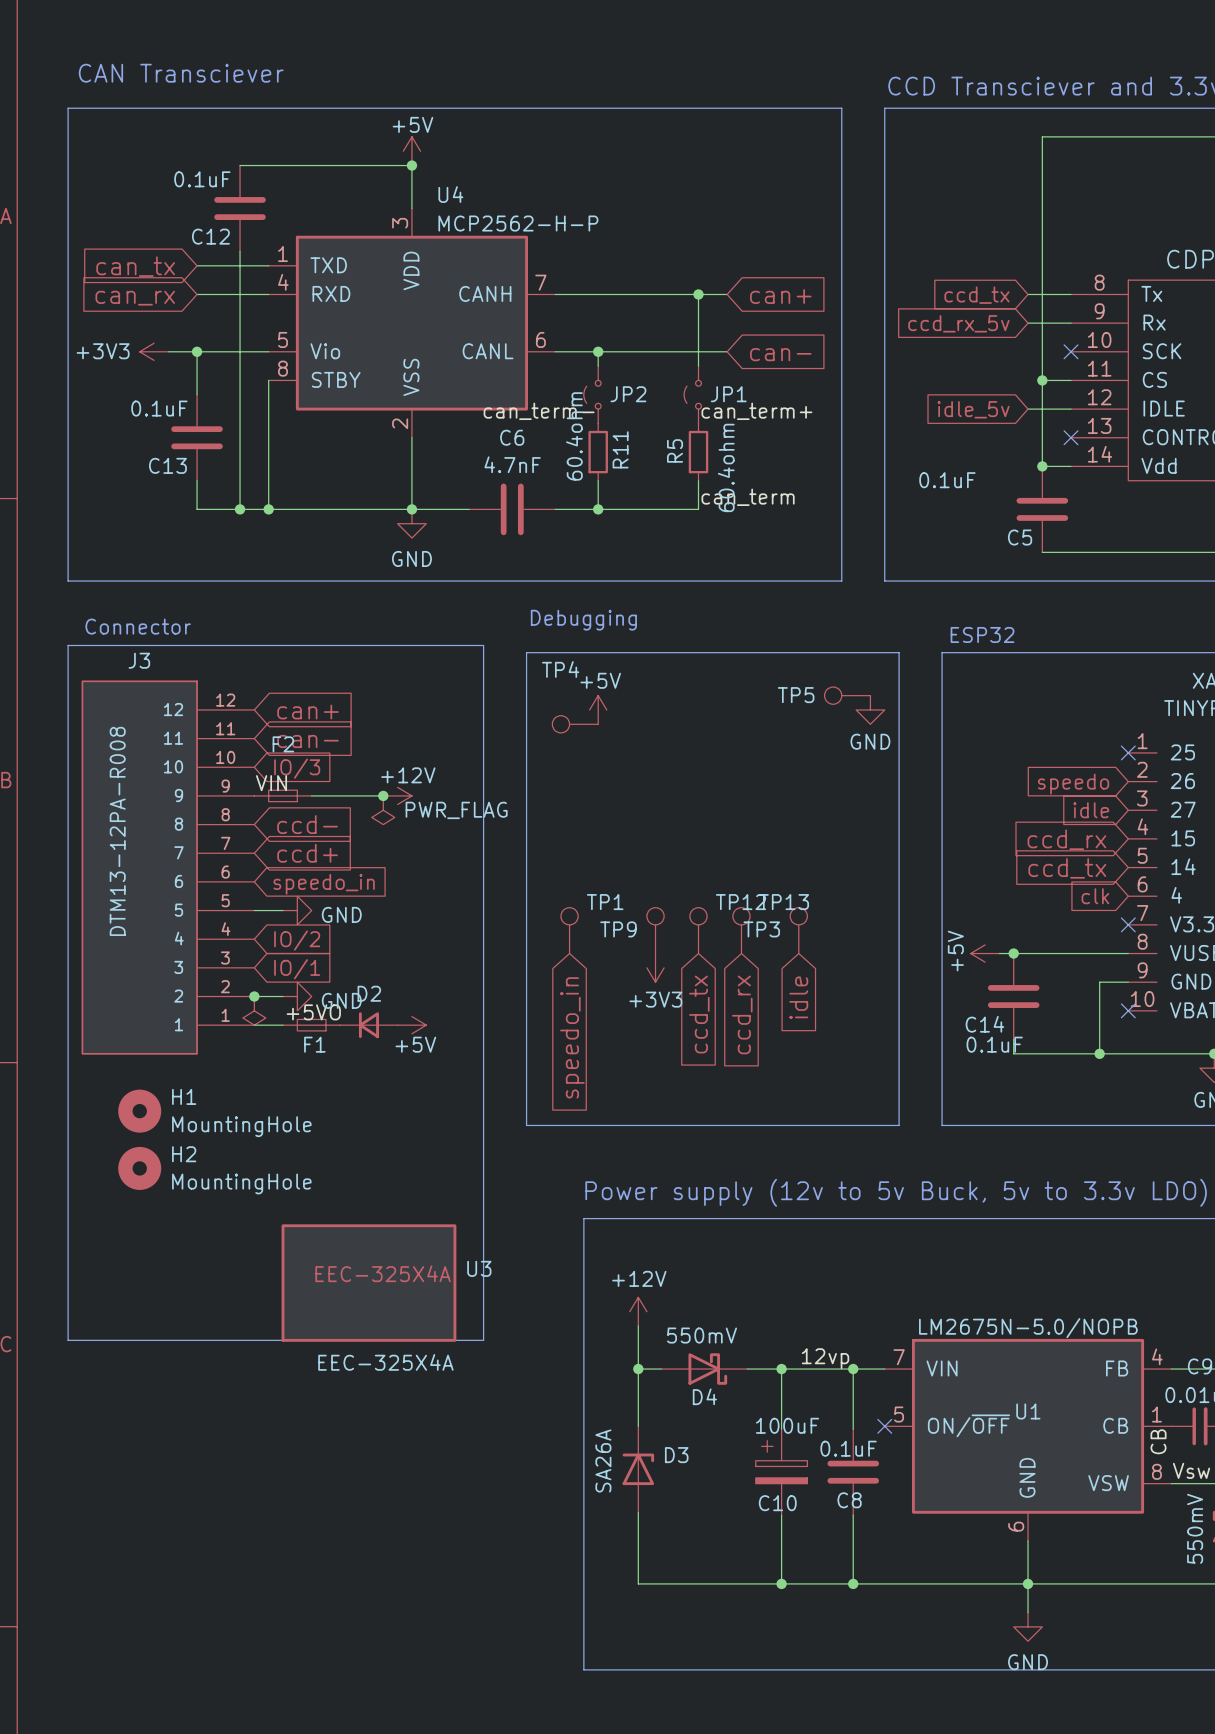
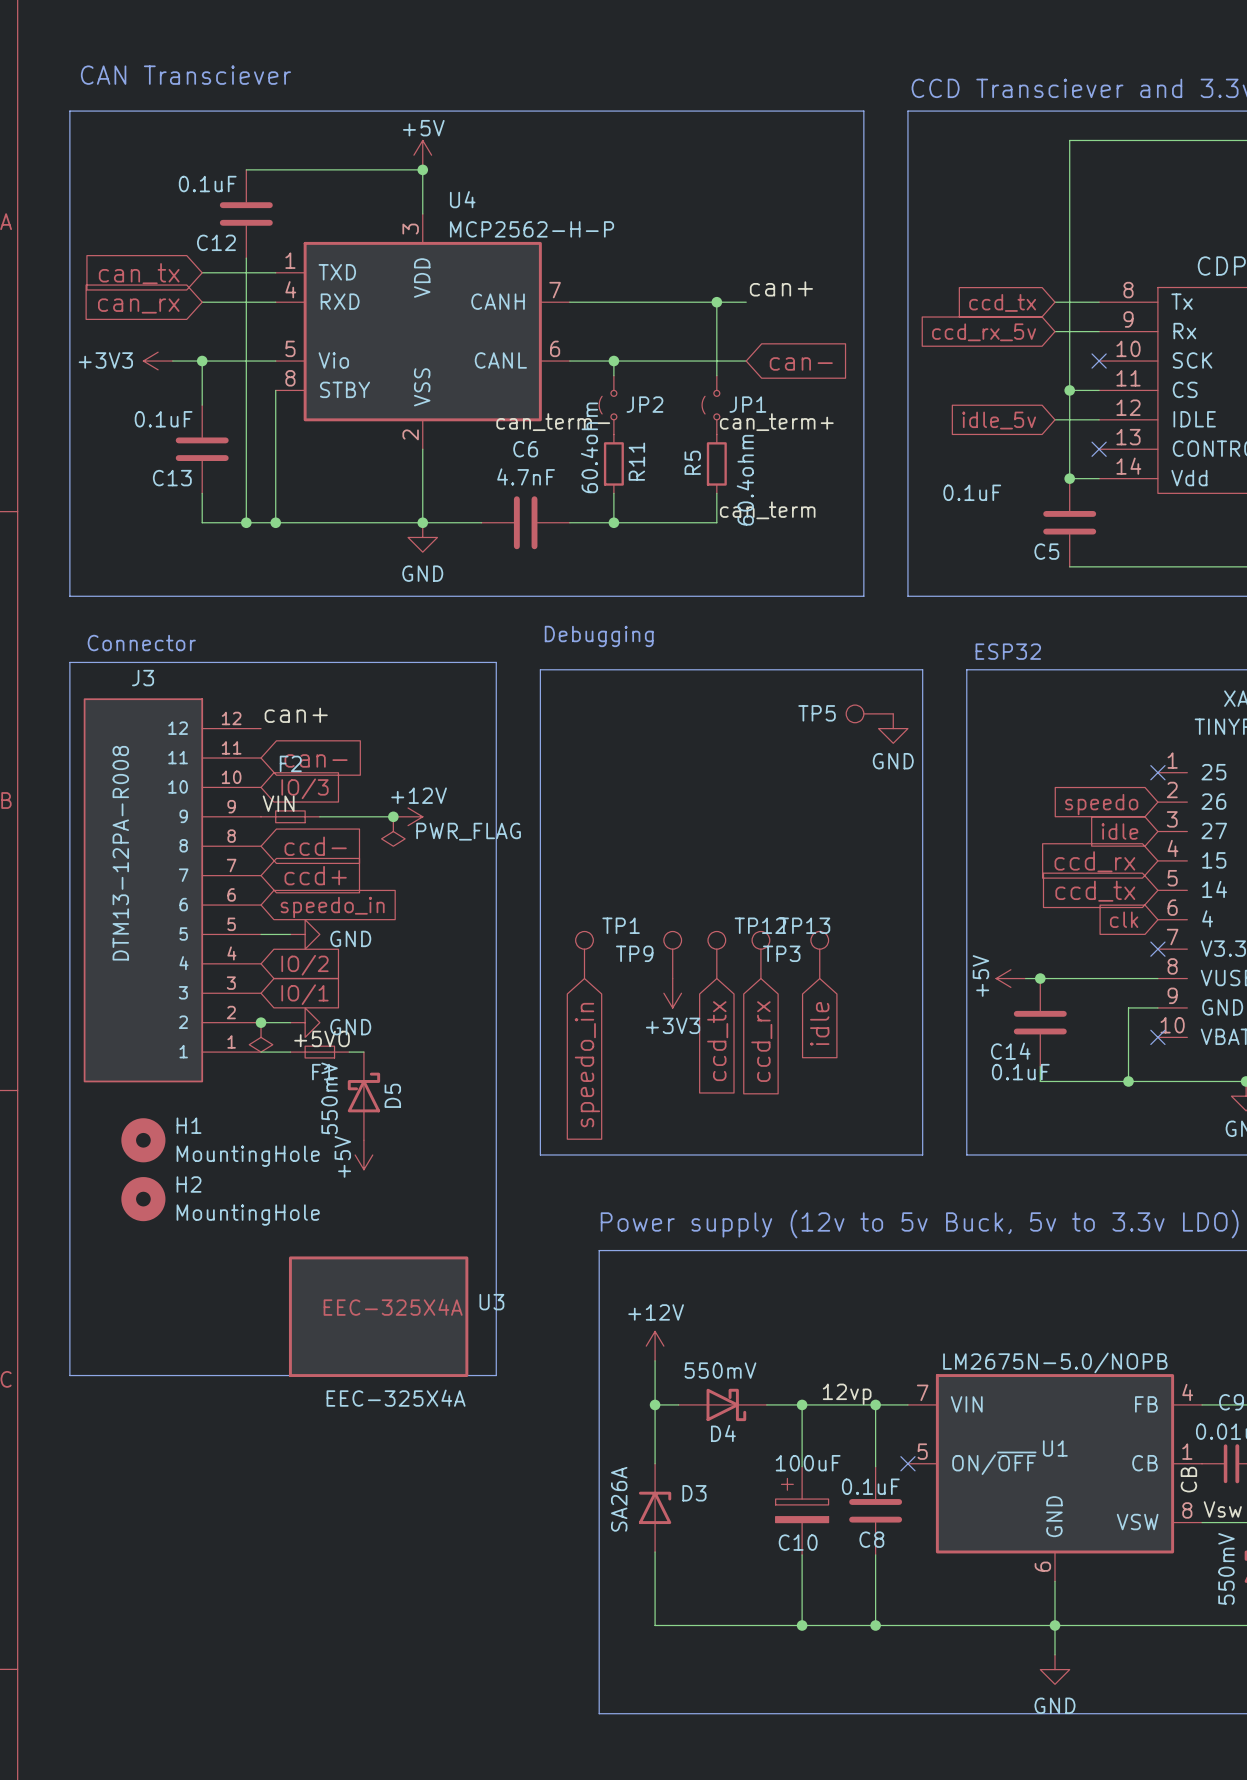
label: none -> can+ (781, 288)
global label: can+ (780, 296) -> none
label: none -> can+ (296, 715)
power symbol: +5V (598, 709) -> none
global label: can+ (307, 712) -> none
TP4: (575, 724) -> none
D2: (368, 1025) -> none
power symbol rotation: 0° (411, 1025) -> 90° clockwise (363, 1154)
power symbol position: +5V (411, 1025) -> +5V (363, 1154)
D5: none -> 550mV (363, 1096)

